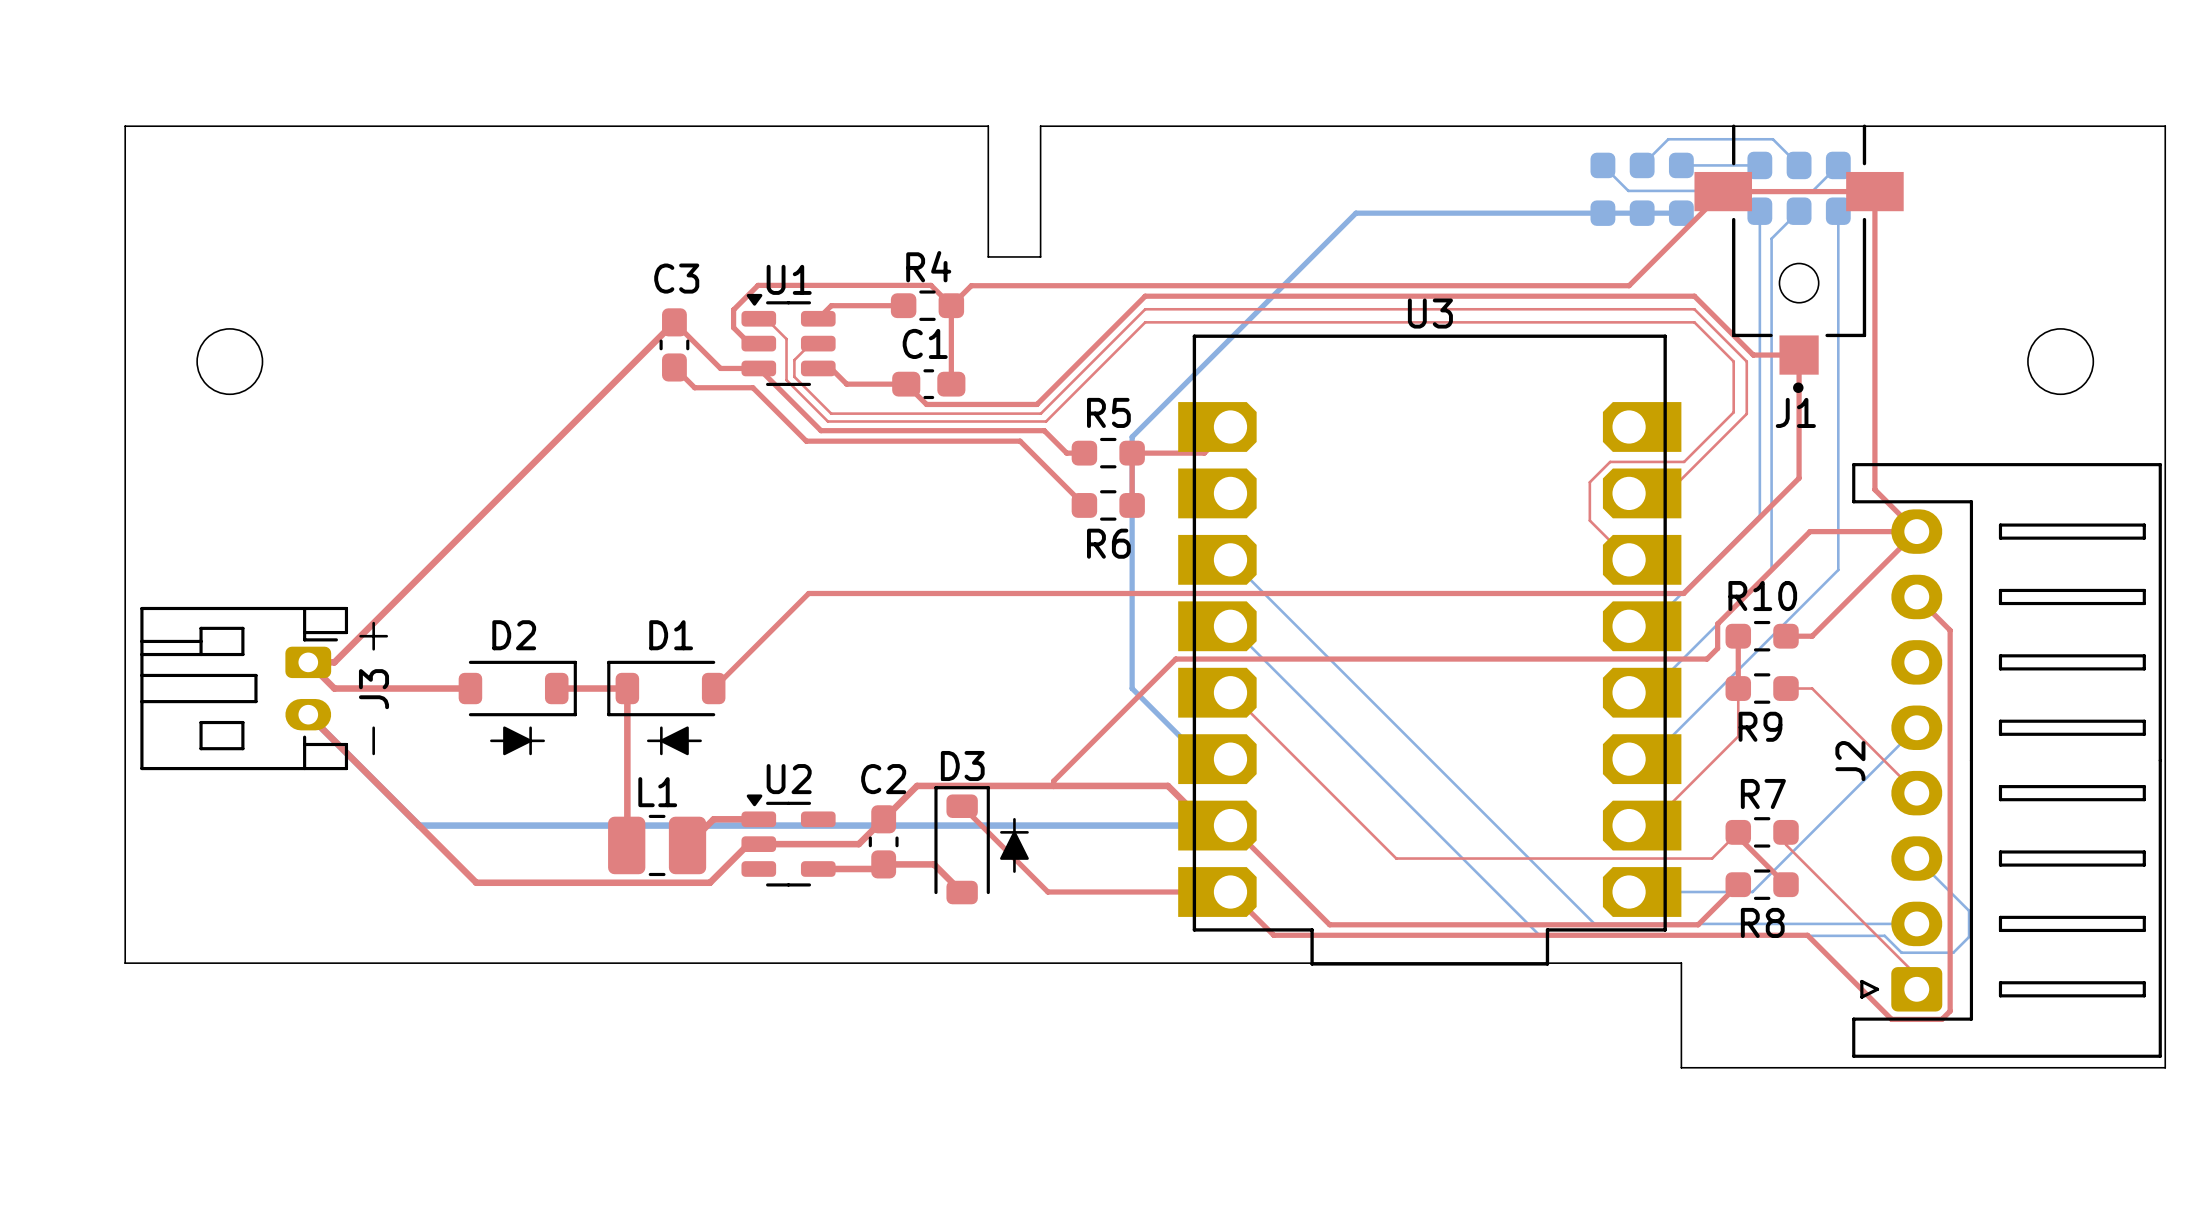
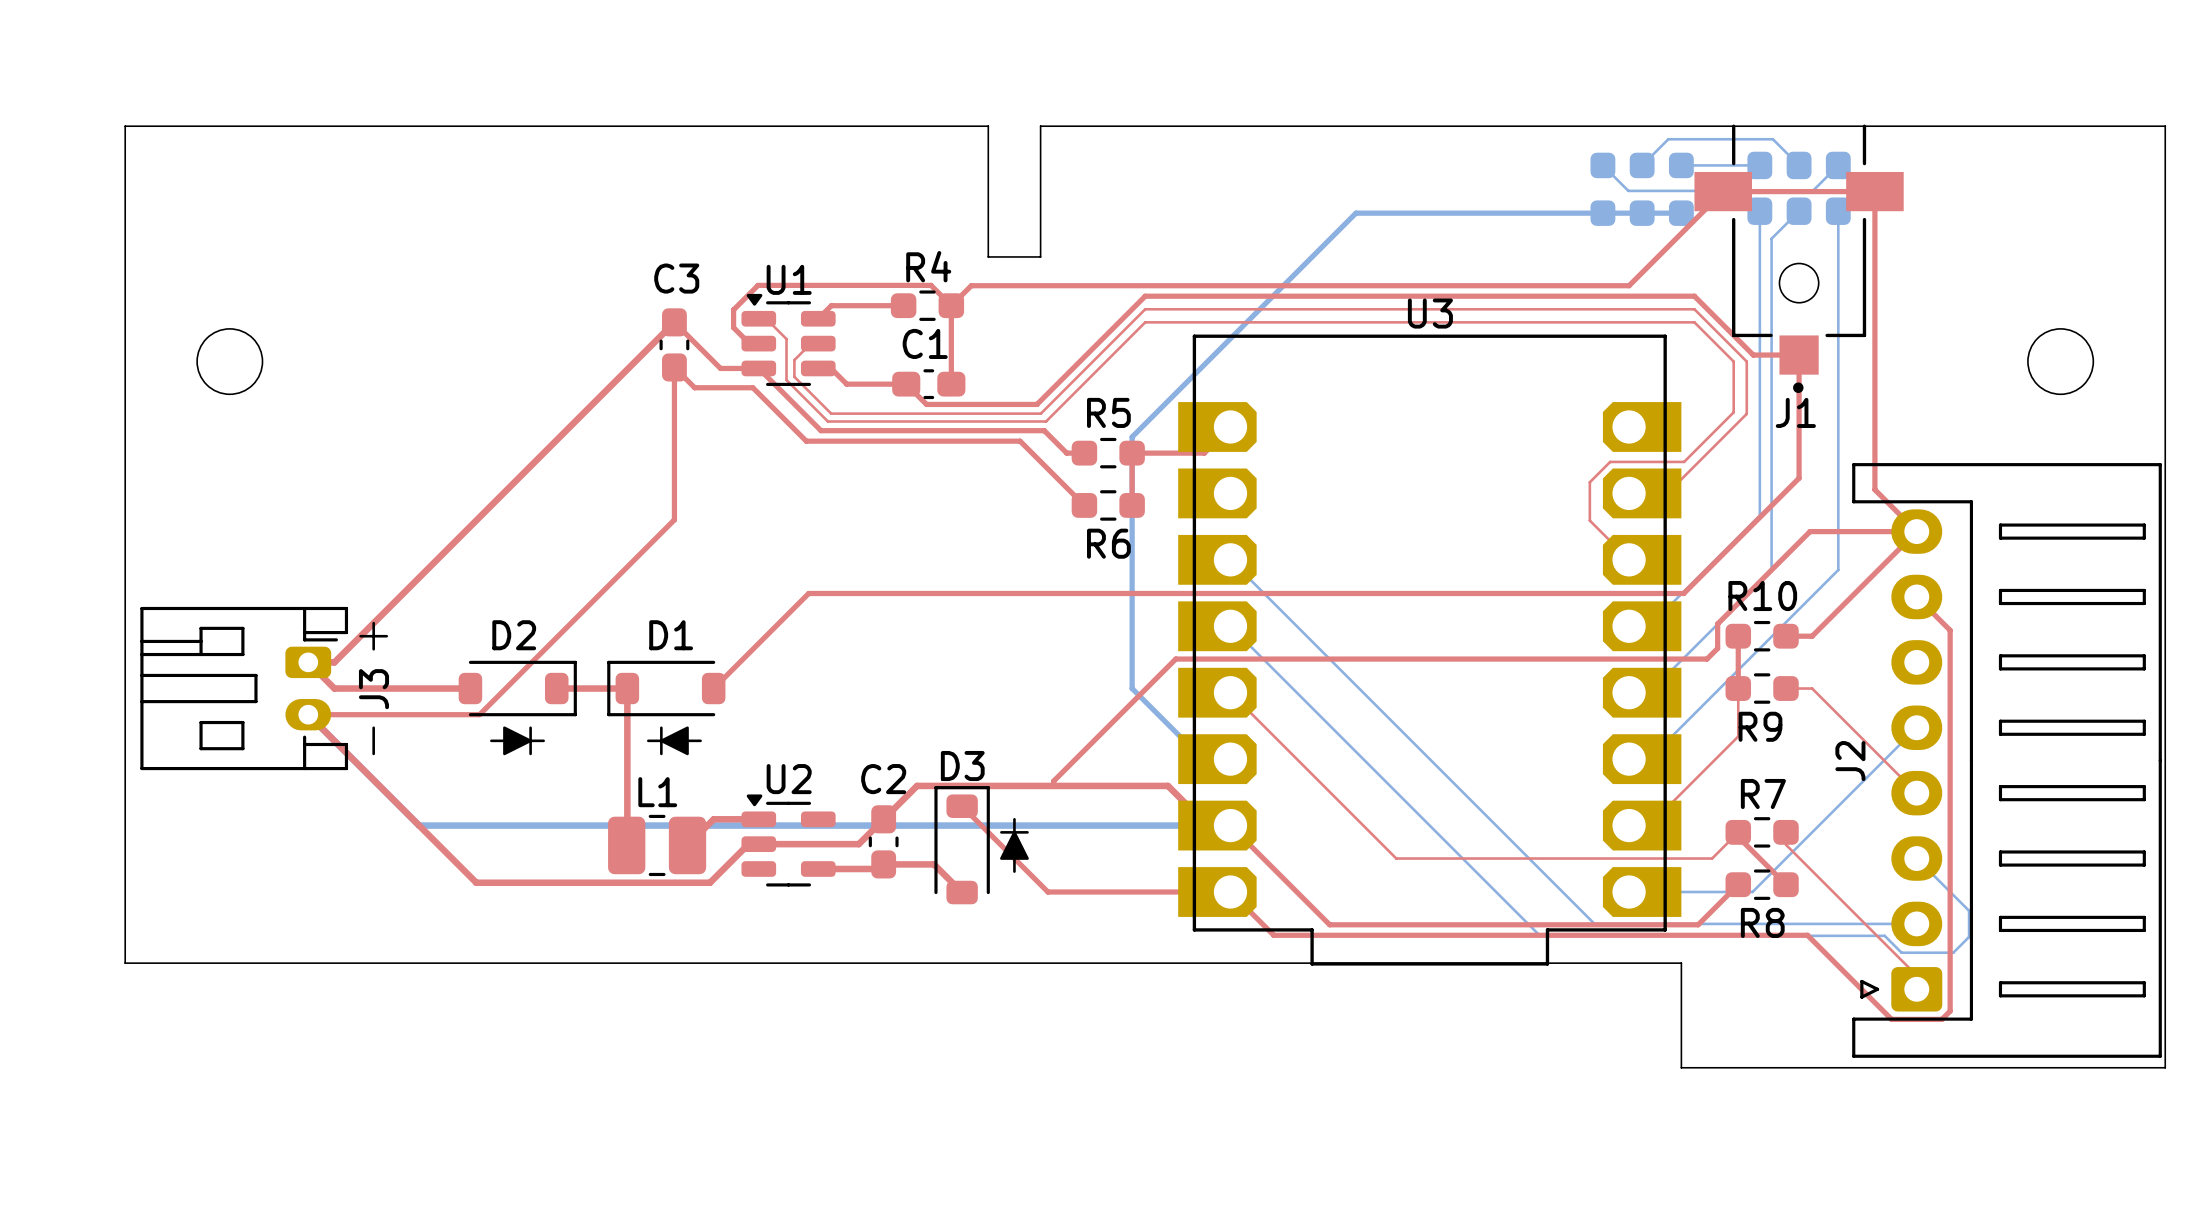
top track: none -> (674, 367) (674, 519) (479, 714) (308, 714)

